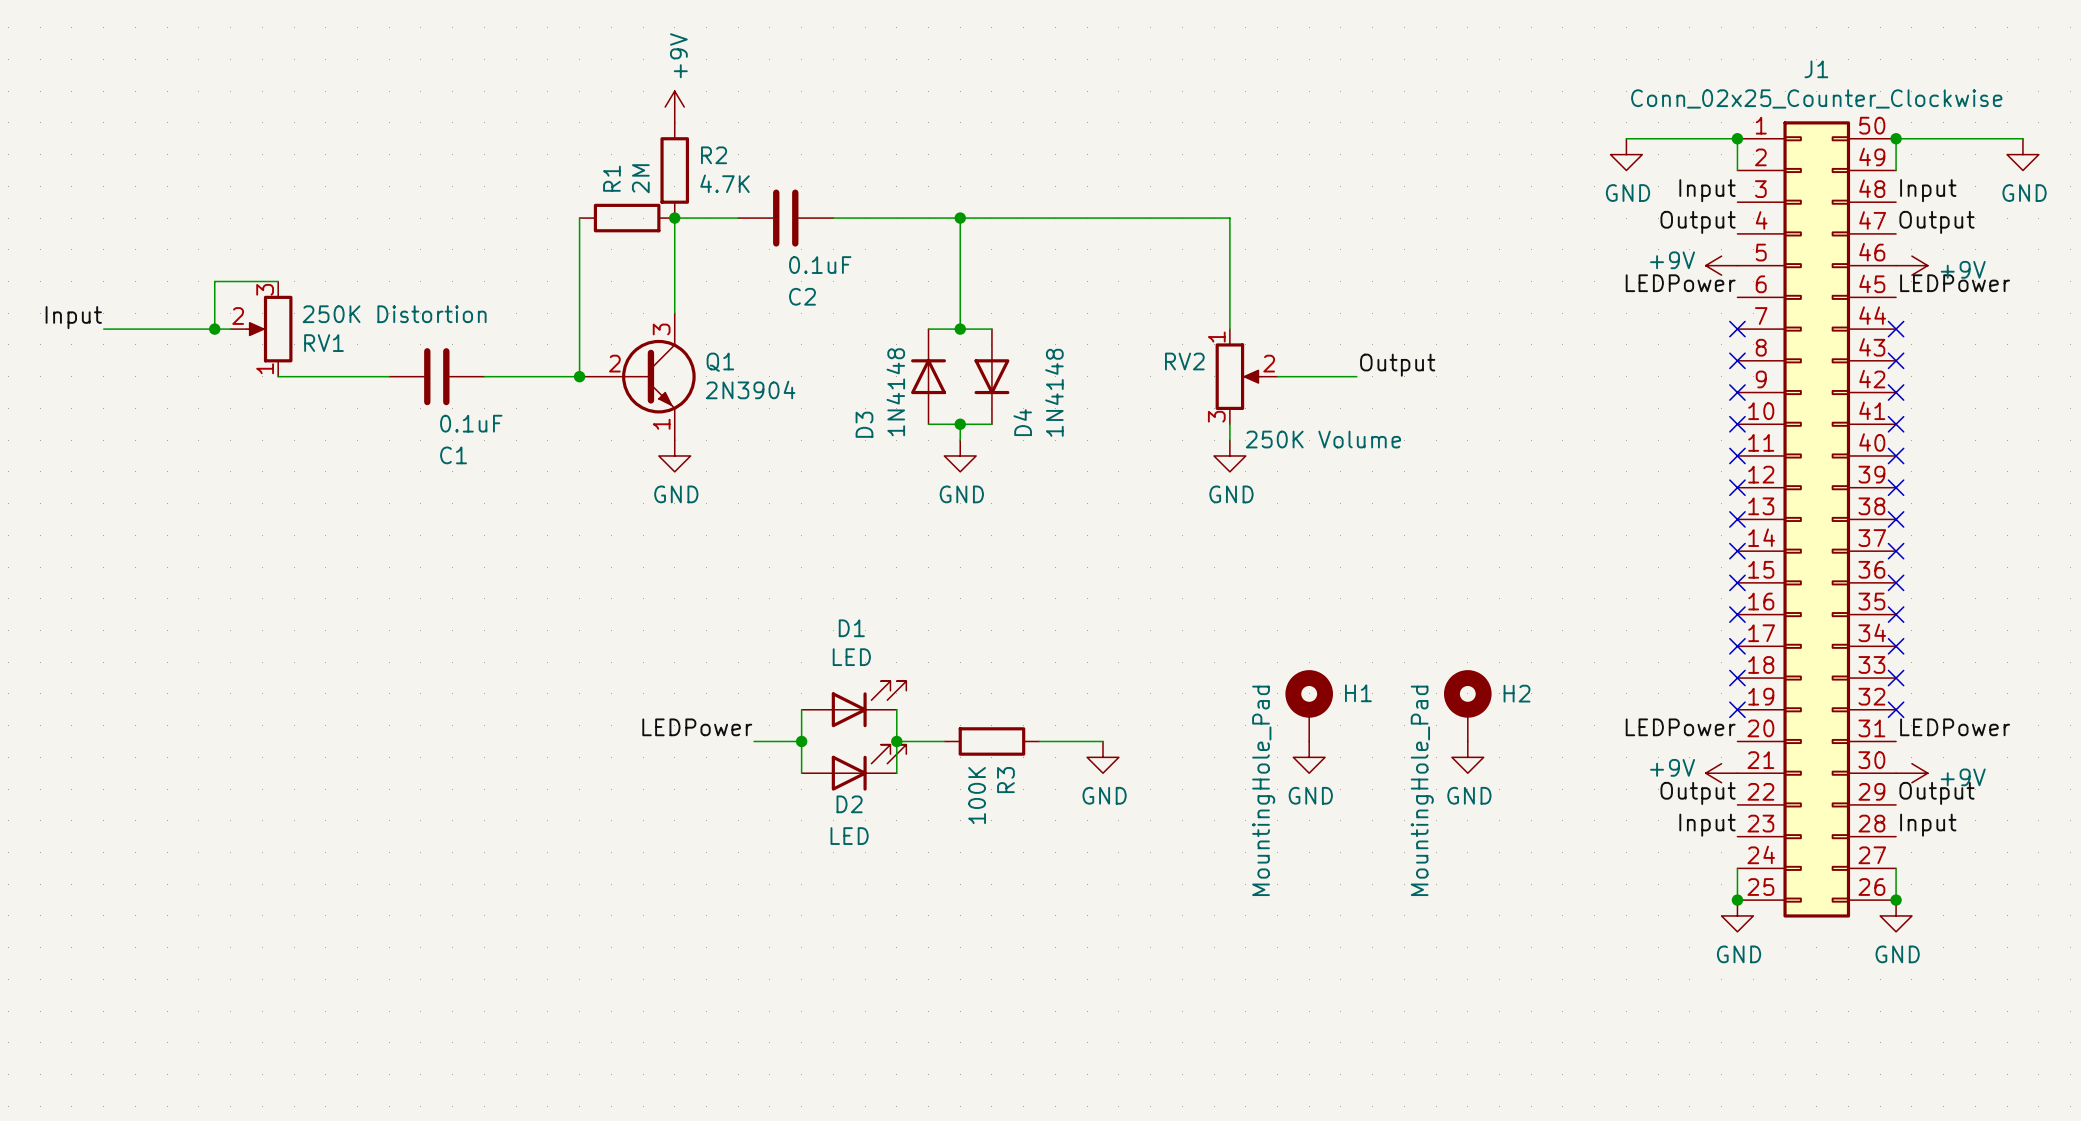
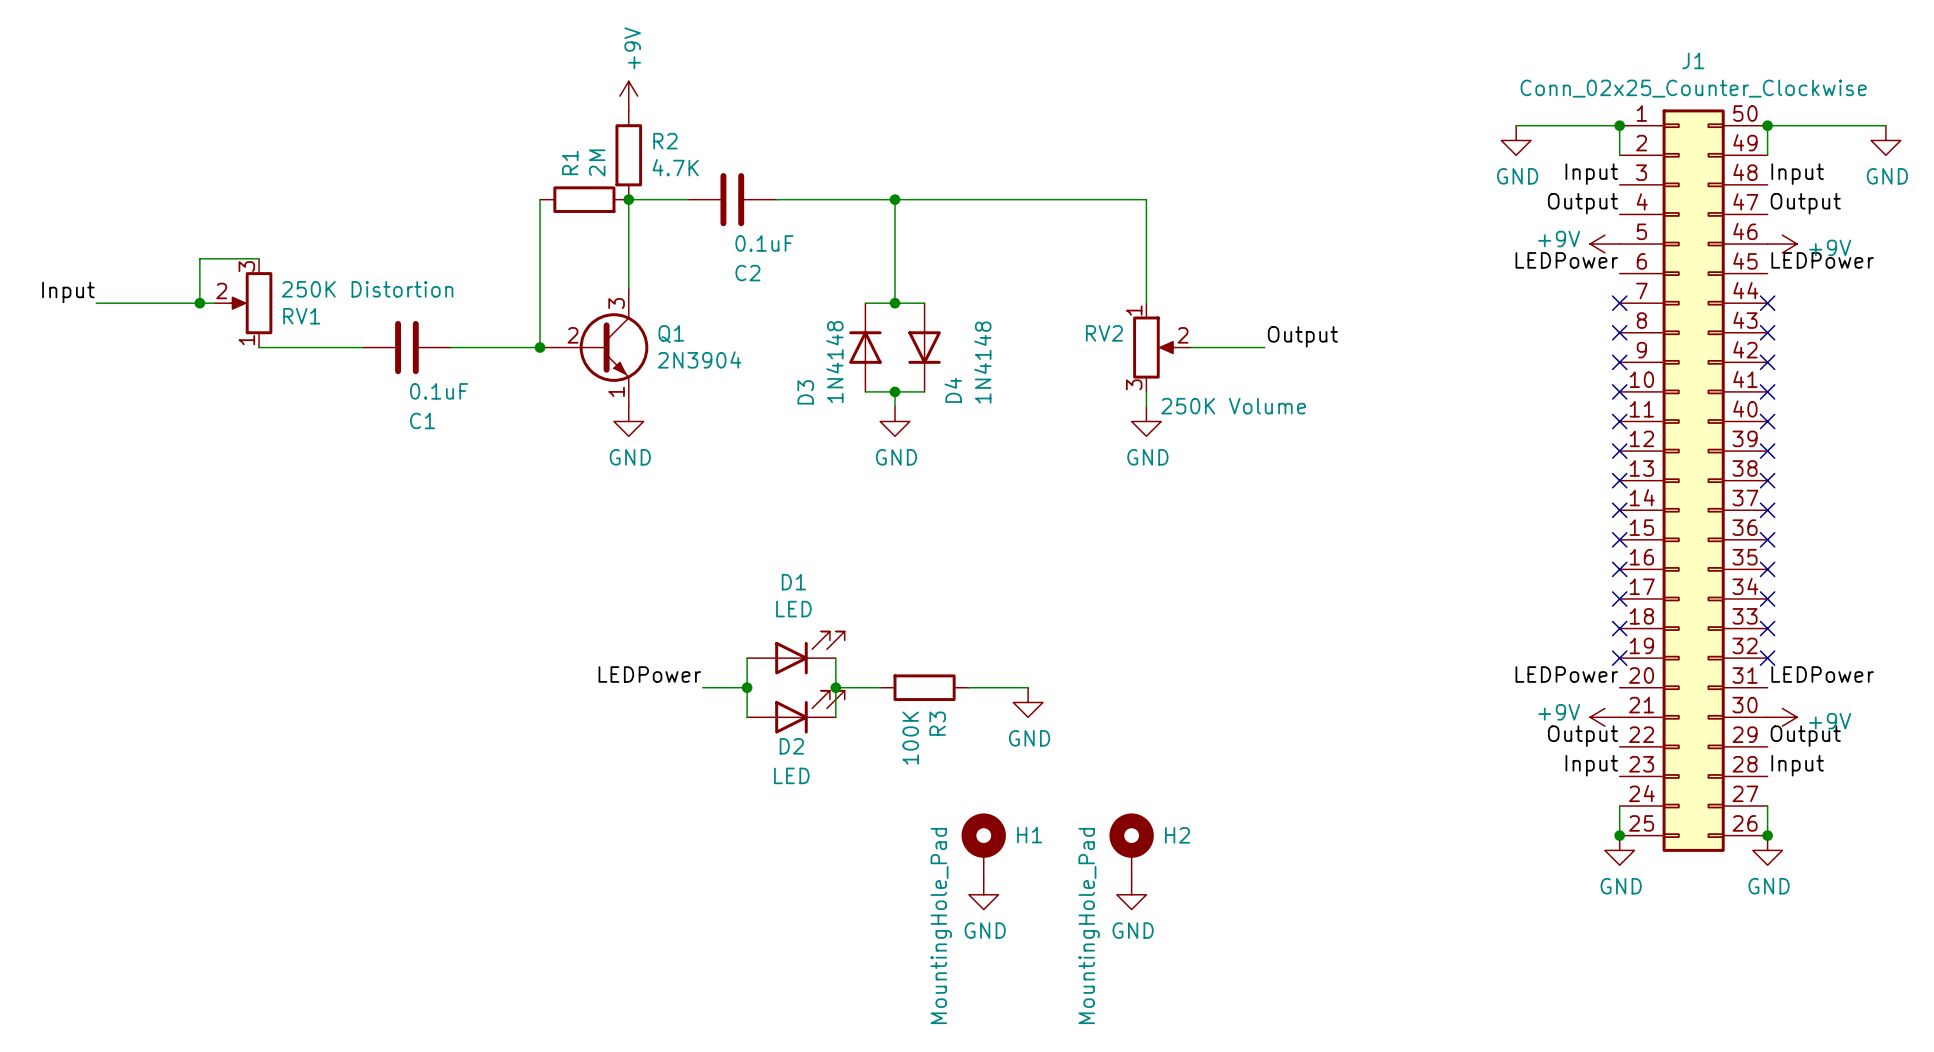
H1 position: (1309, 705) -> (983, 846)
H2 position: (1467, 705) -> (1131, 846)
power symbol: GND (1309, 757) -> none
power symbol: GND (1467, 757) -> none
power symbol: none -> GND (983, 894)
power symbol: none -> GND (1131, 894)

